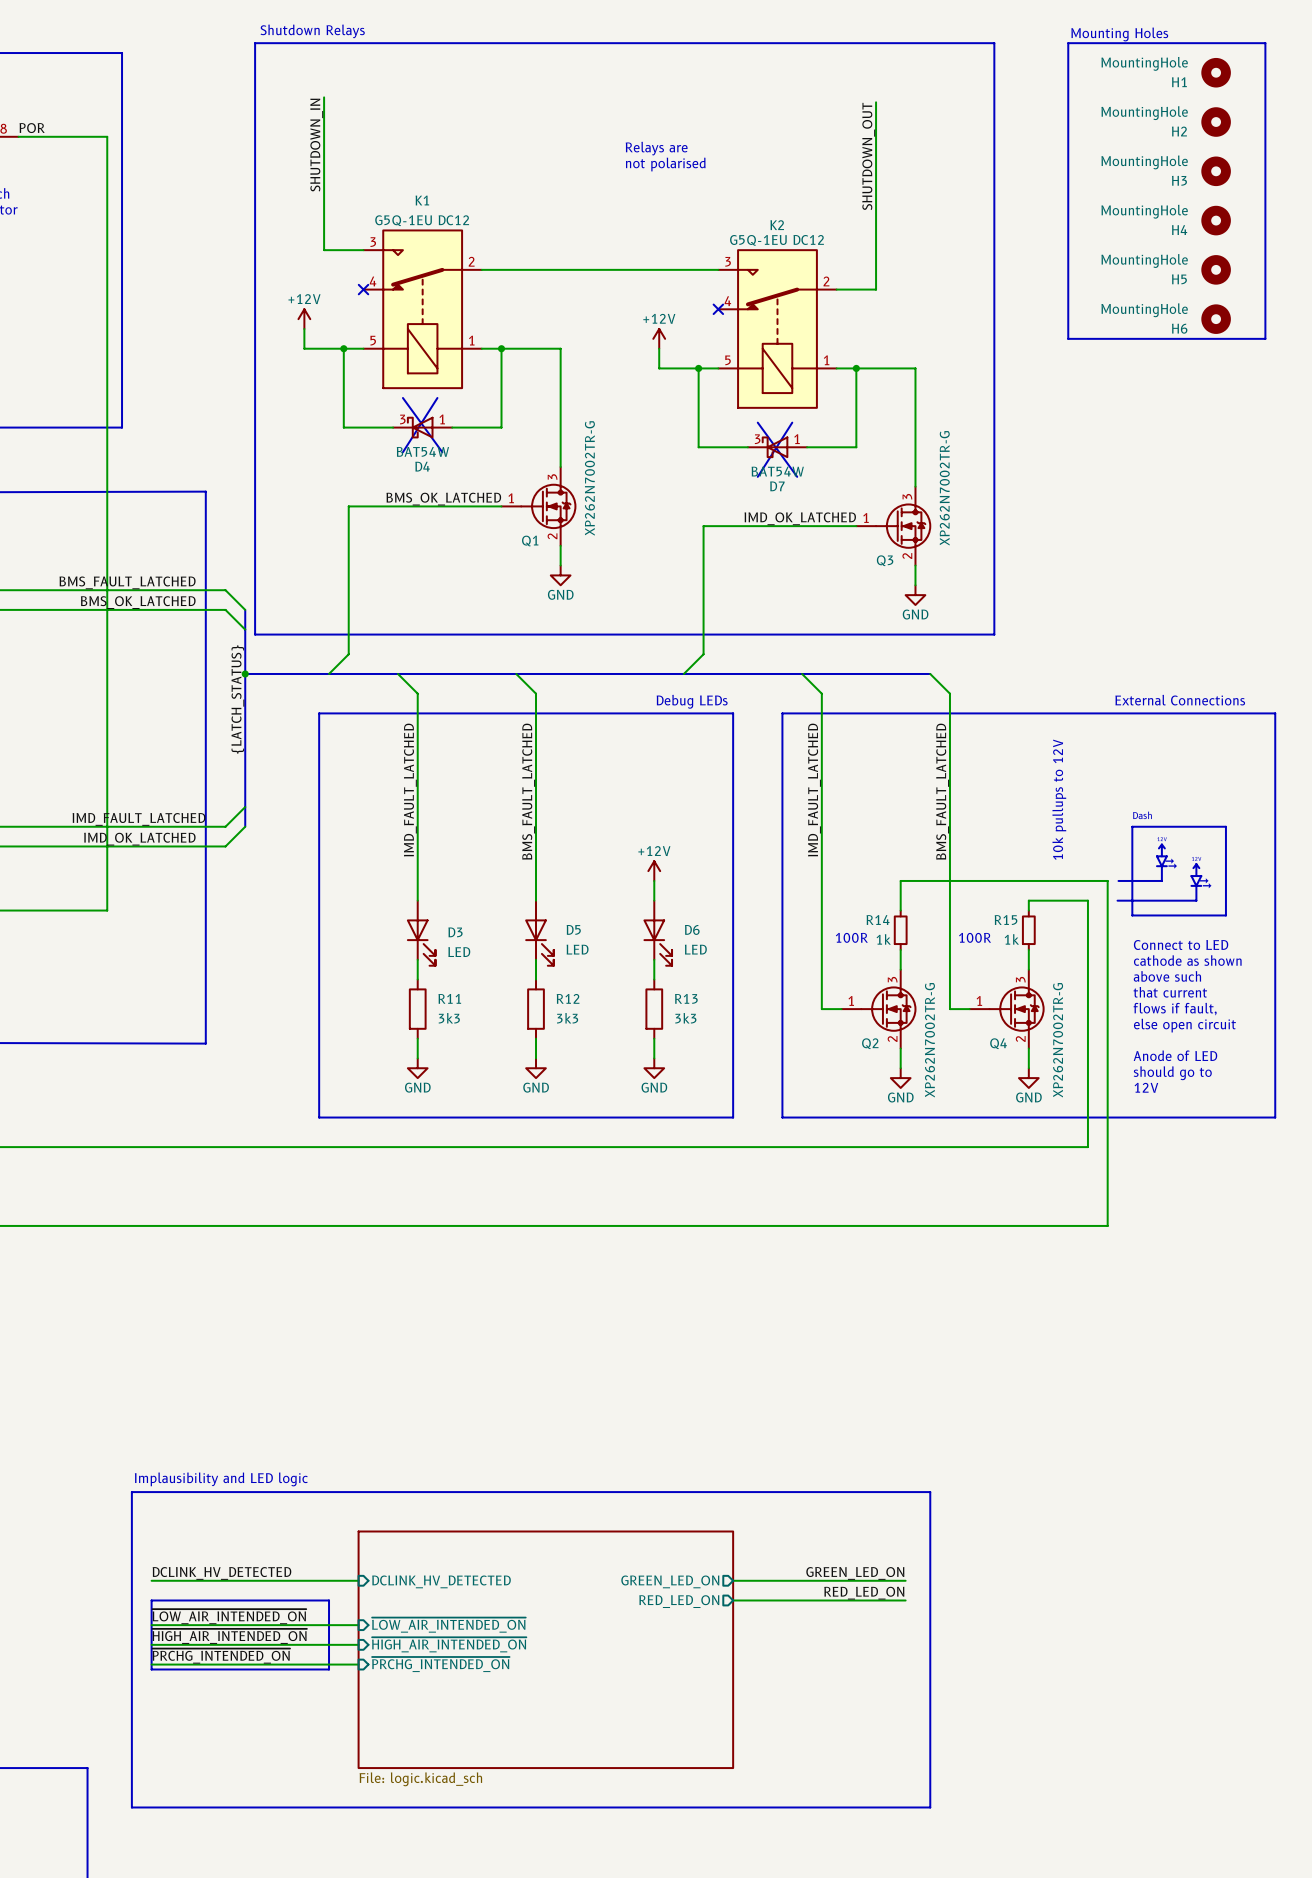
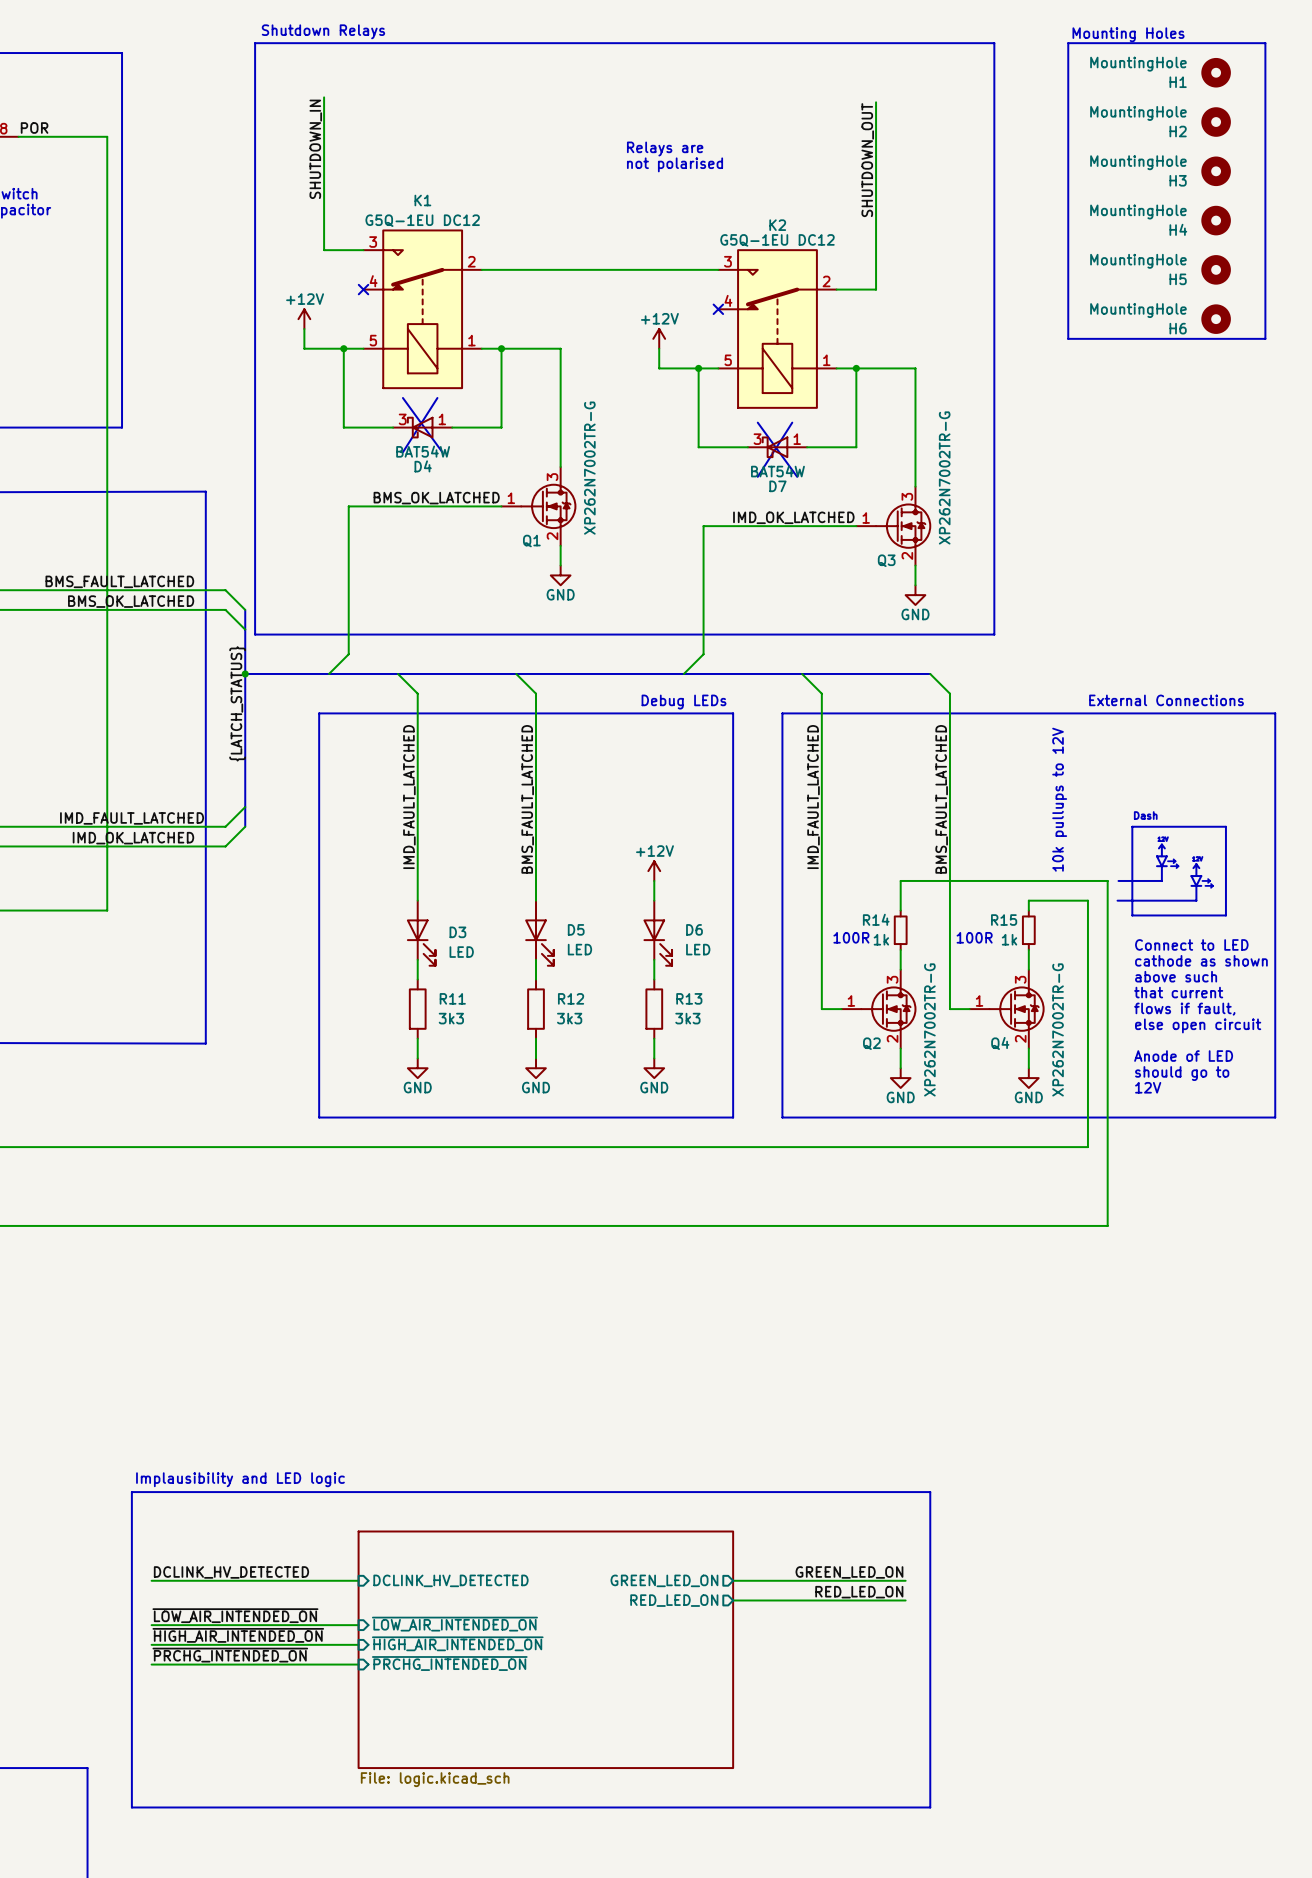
line: (151, 1600) (329, 1600) (329, 1669) (151, 1669) (151, 1600) -> none

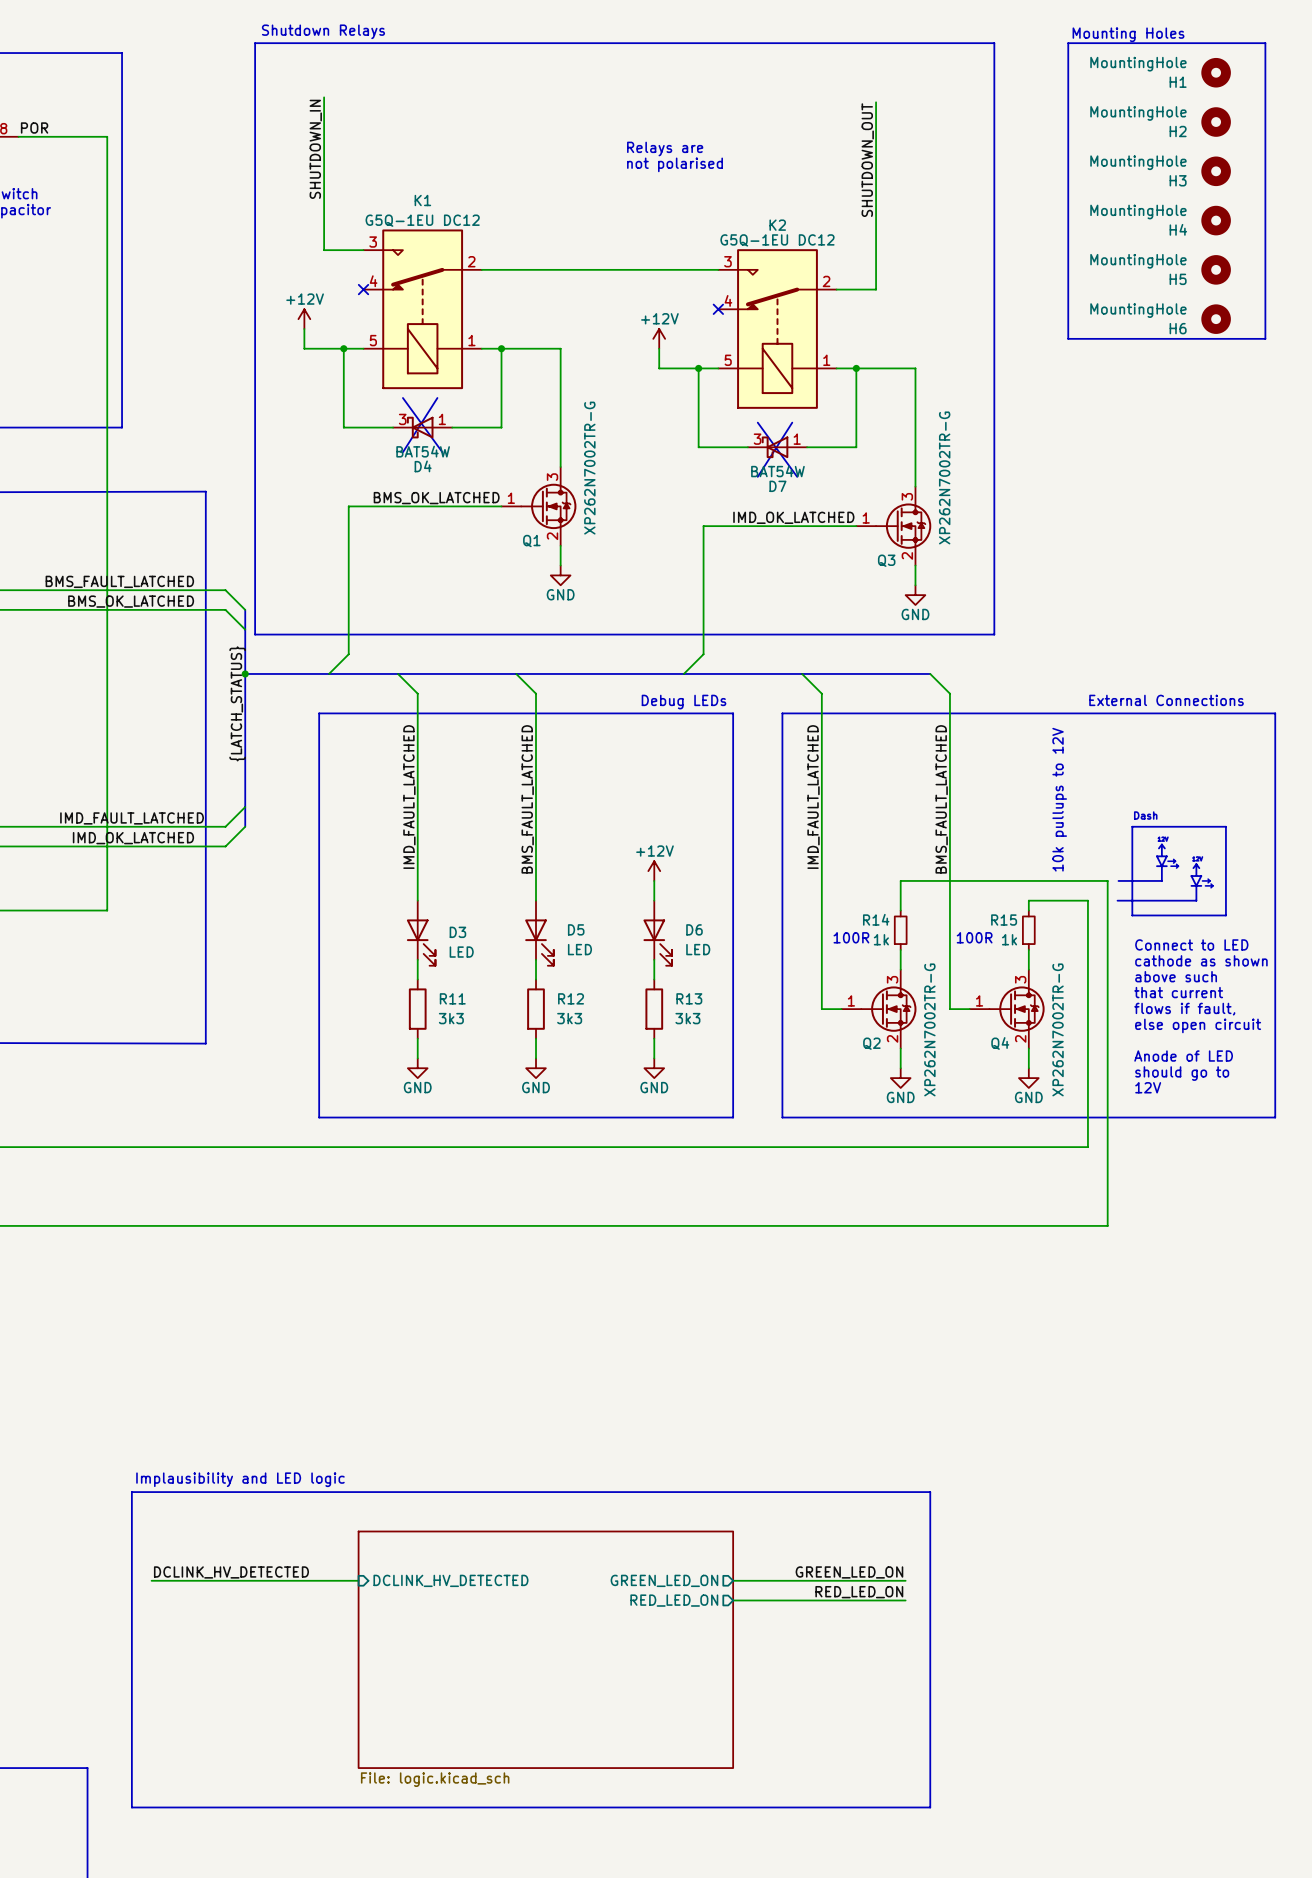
label: ~{LOW_AIR_INTENDED_ON} (235, 1615) -> none
sheet pin: ~{LOW_AIR_INTENDED_ON} (454, 1624) -> none
wire: (151, 1625) (358, 1625) -> none
label: ~{HIGH_AIR_INTENDED_ON} (238, 1635) -> none
sheet pin: ~{HIGH_AIR_INTENDED_ON} (457, 1643) -> none
wire: (151, 1644) (358, 1644) -> none
label: ~{PRCHG_INTENDED_ON} (230, 1655) -> none
sheet pin: ~{PRCHG_INTENDED_ON} (449, 1663) -> none
wire: (151, 1664) (358, 1664) -> none

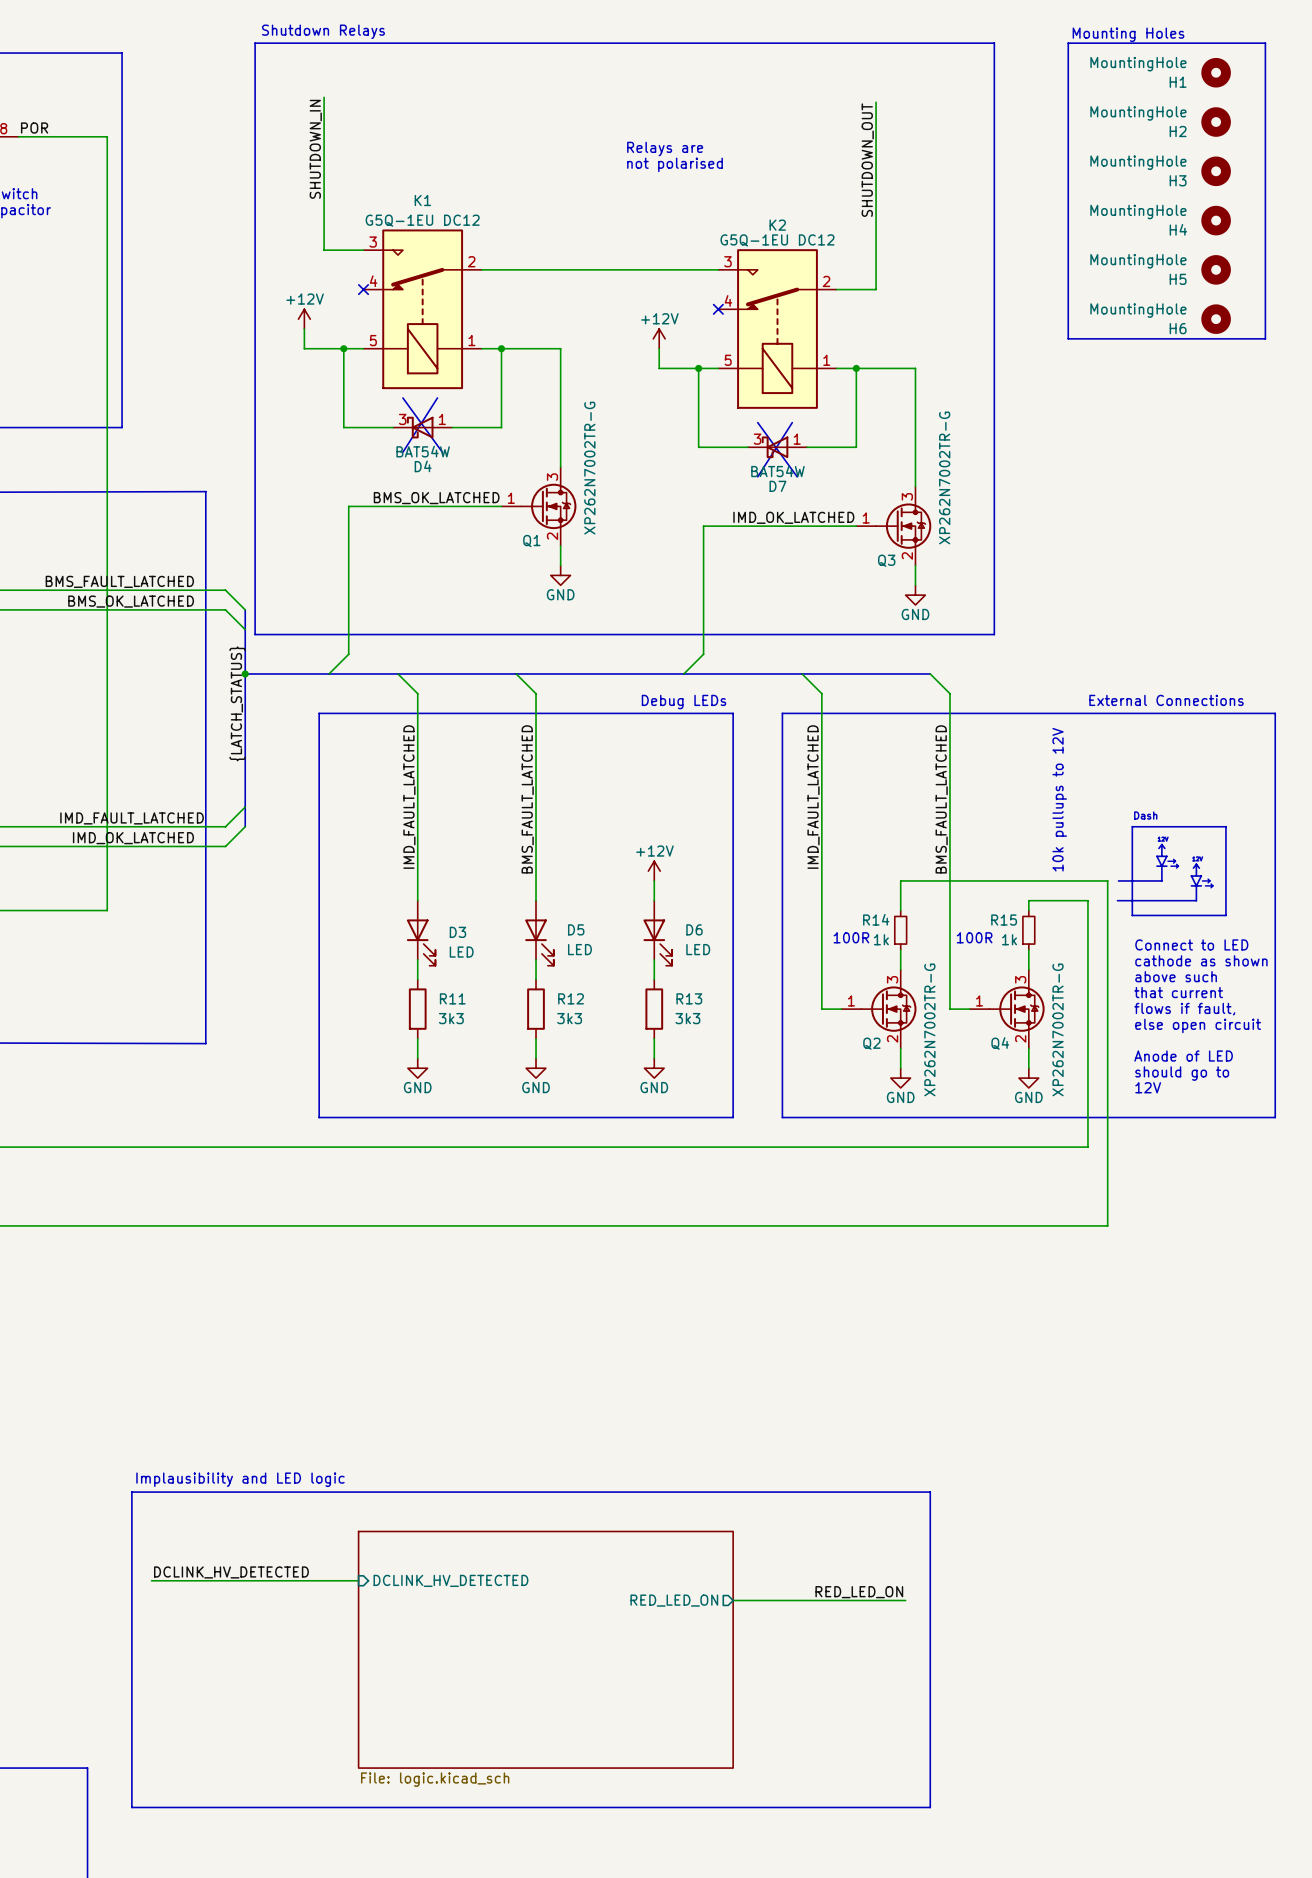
label: GREEN_LED_ON (849, 1572) -> none
sheet pin: GREEN_LED_ON (664, 1580) -> none
wire: (733, 1580) (905, 1580) -> none

